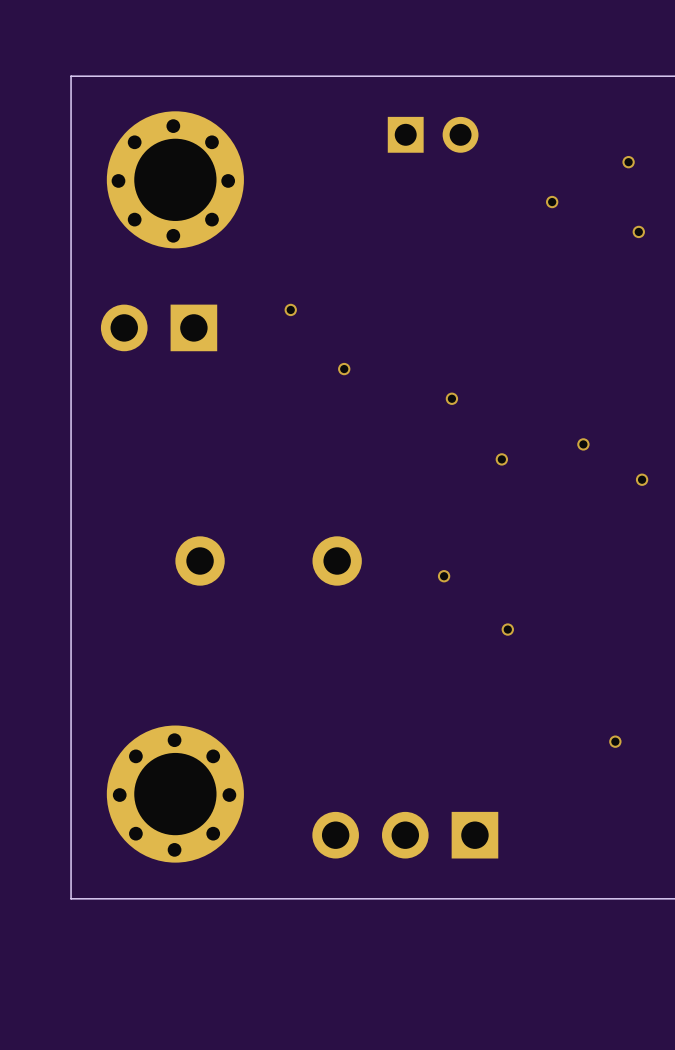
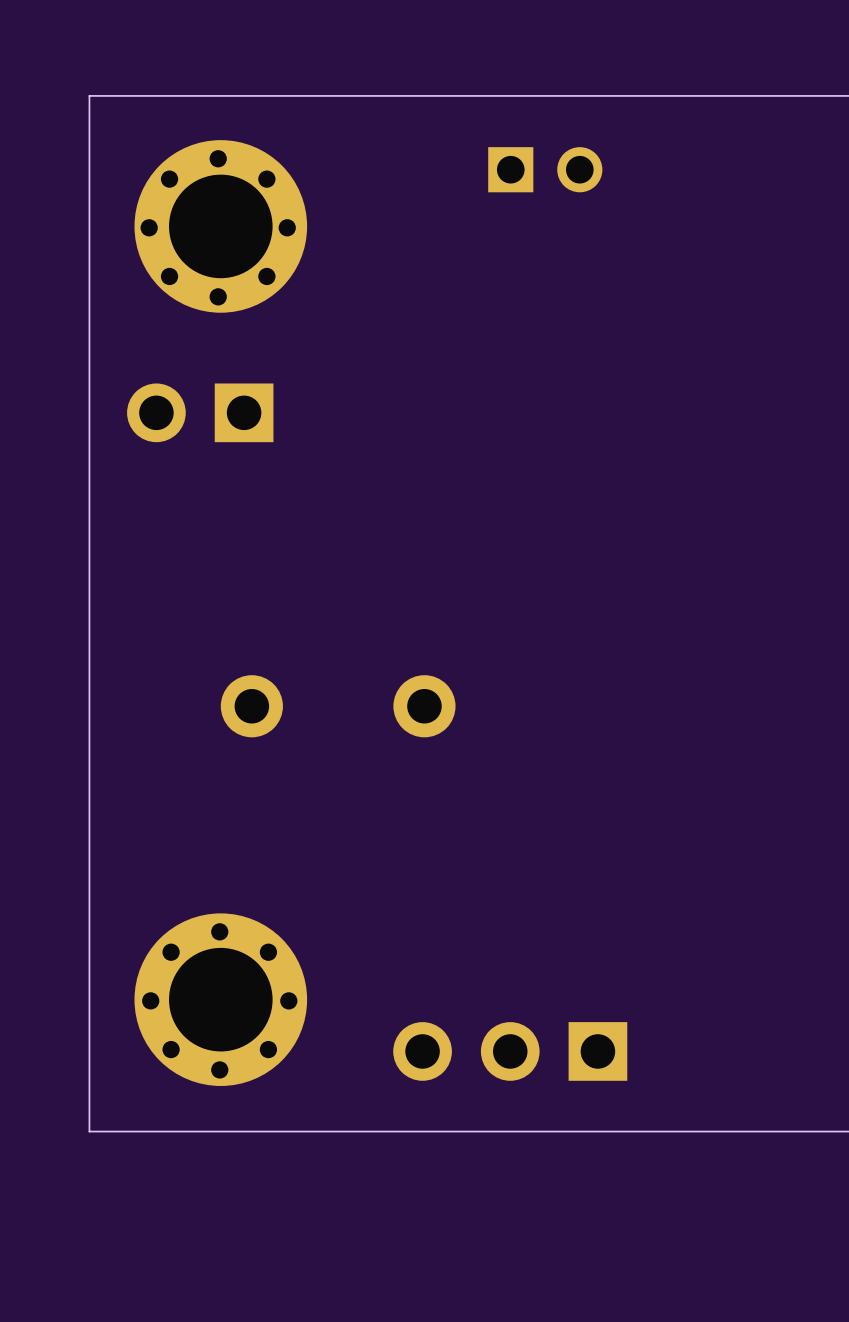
via: (628, 162) -> none
via: (552, 202) -> none
via: (638, 231) -> none
via: (290, 309) -> none
via: (344, 369) -> none
via: (451, 398) -> none
via: (583, 444) -> none
via: (501, 459) -> none
via: (642, 479) -> none
via: (444, 576) -> none
via: (507, 629) -> none
via: (615, 741) -> none

